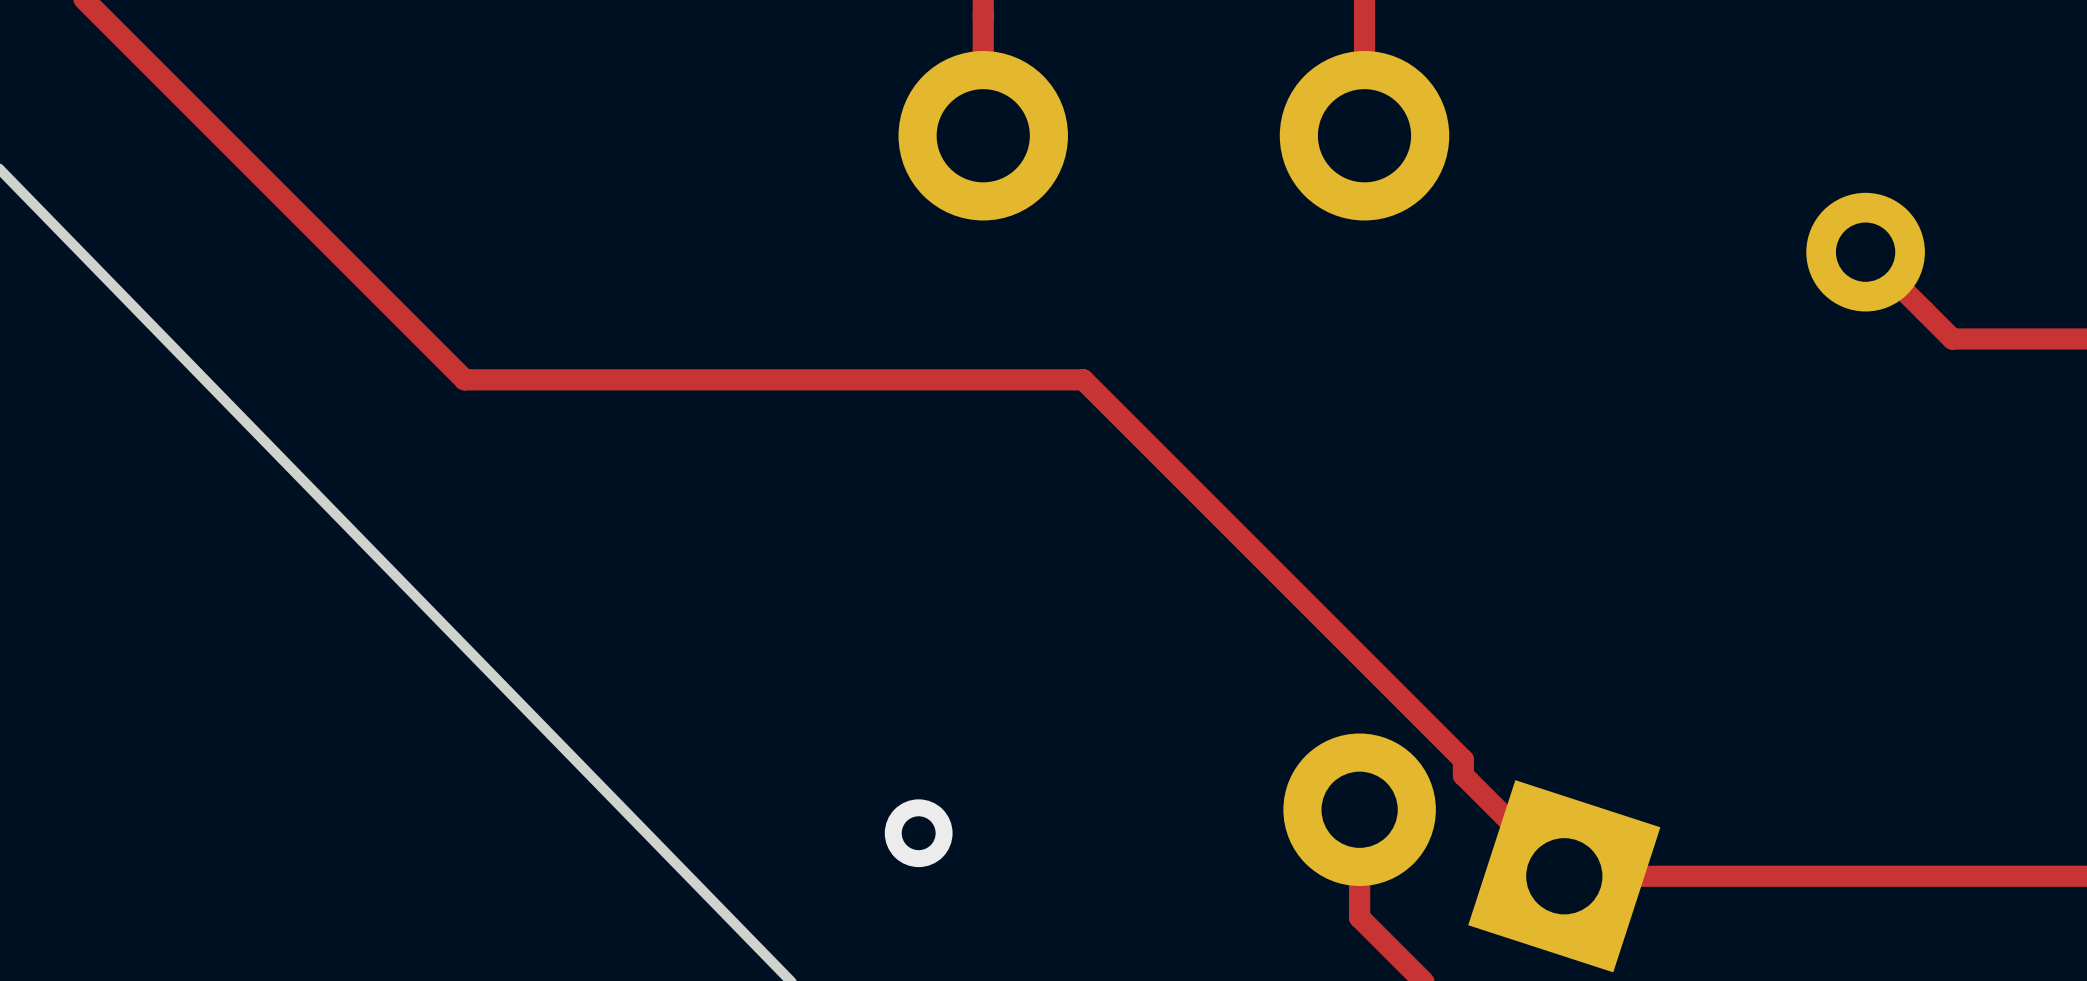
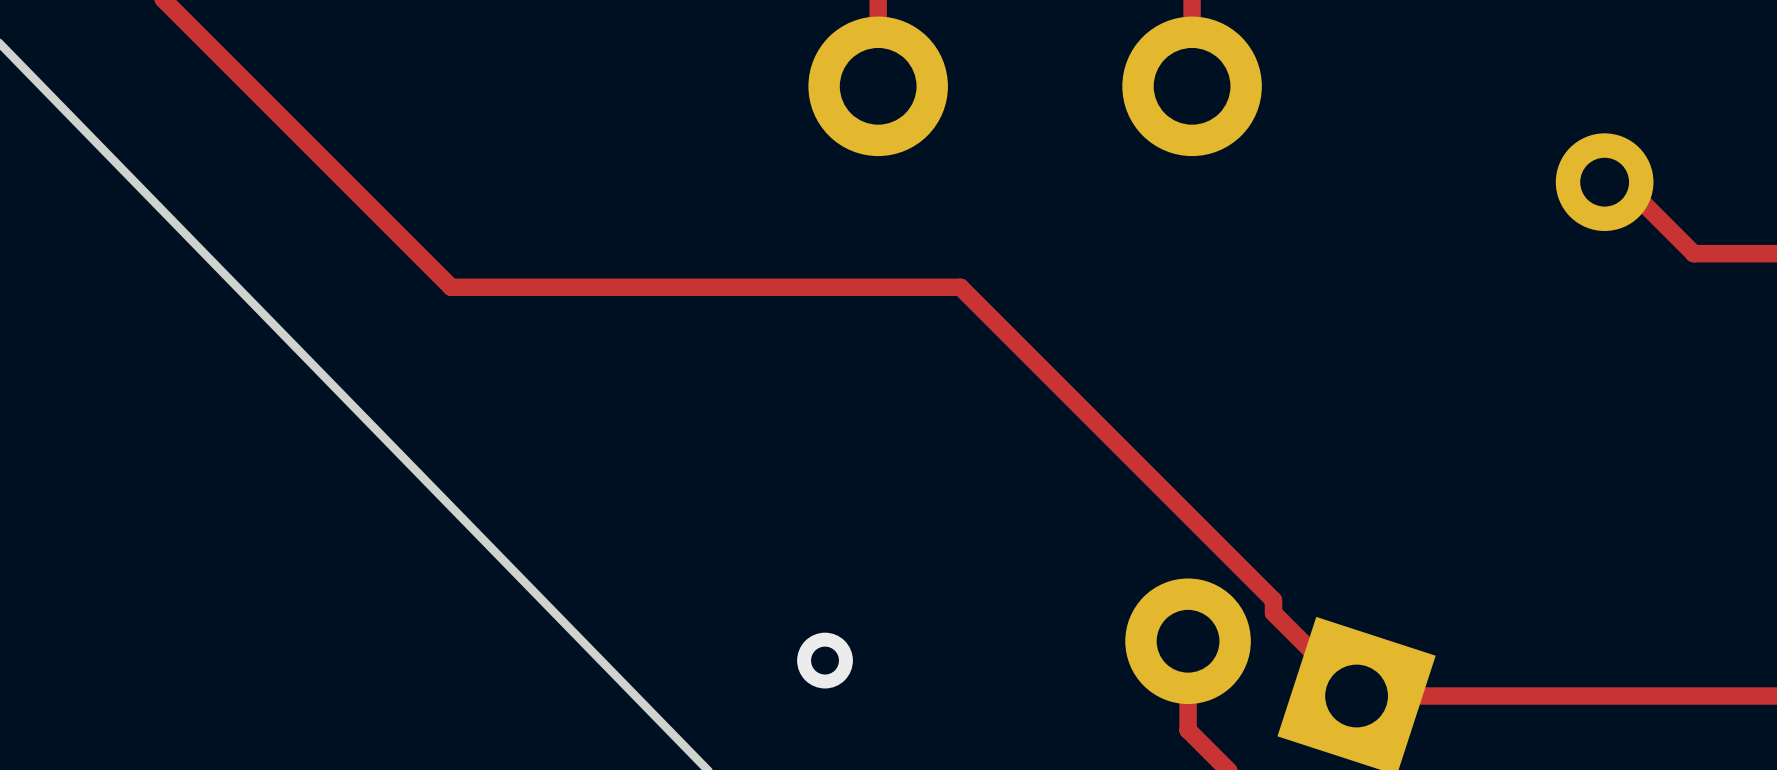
top track: (1865, 252) (1952, 339) (1973, 339) -> (1604, 164) (1693, 253)

